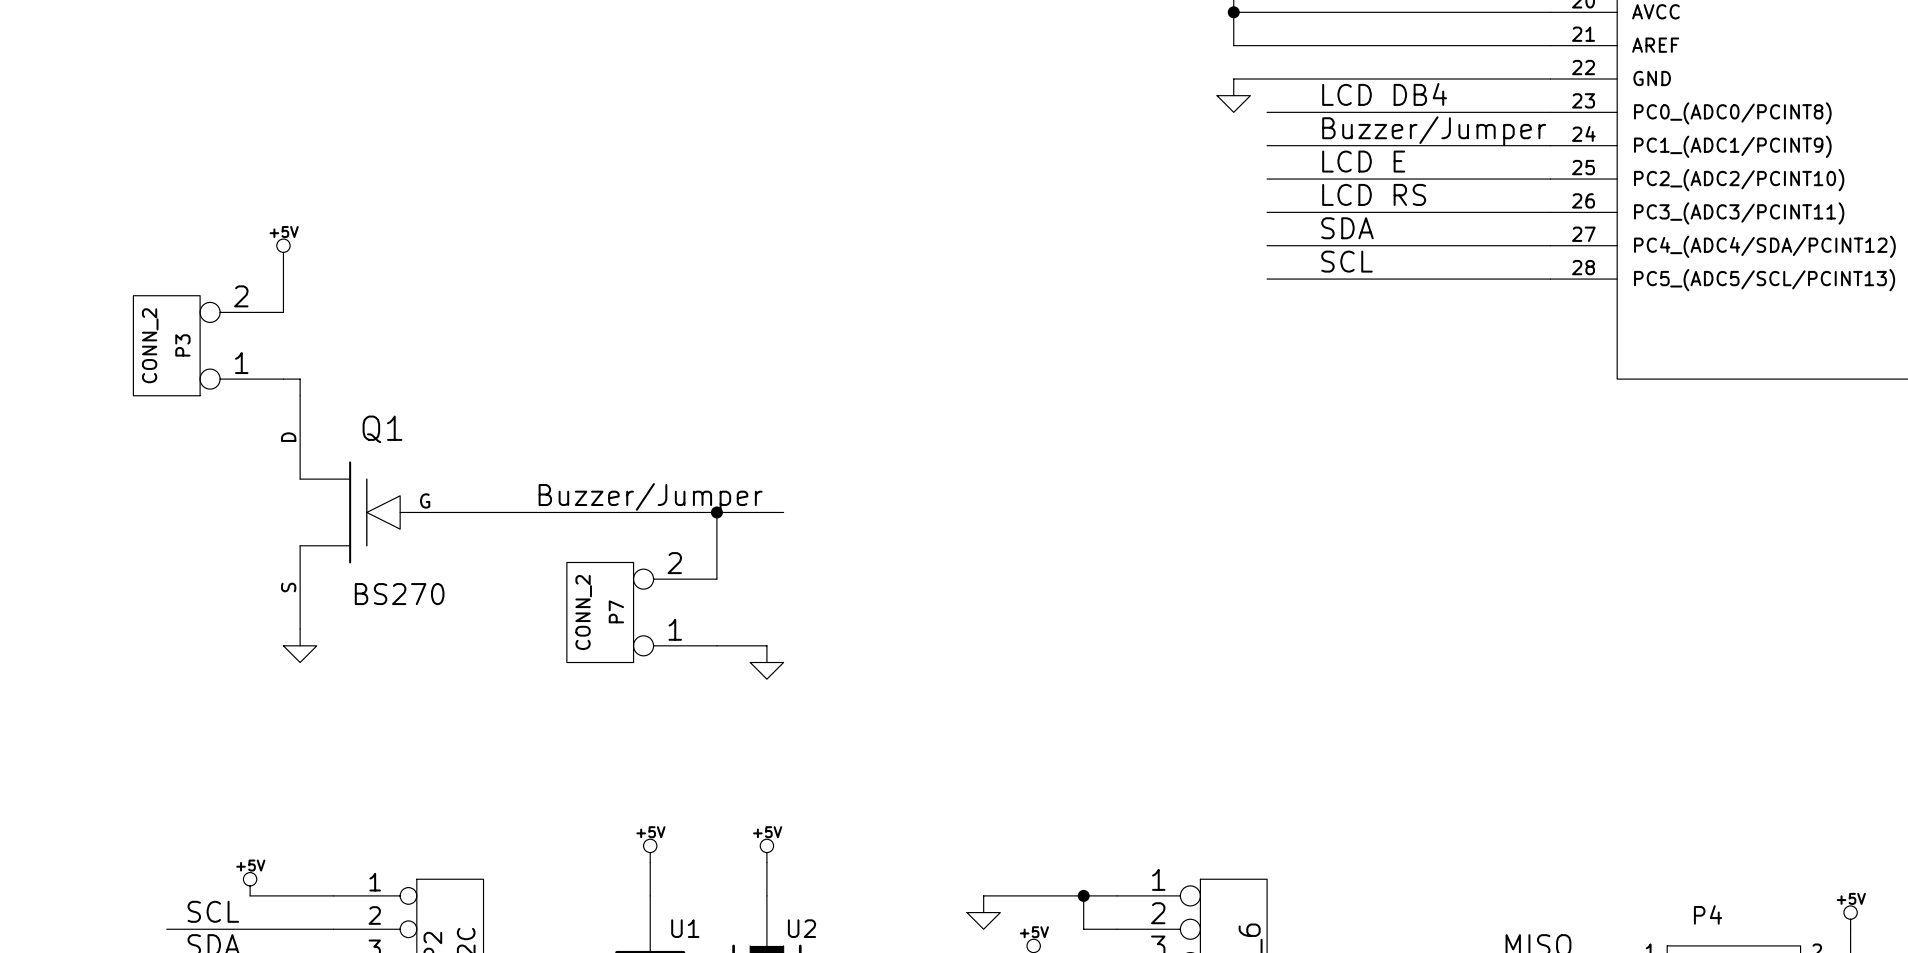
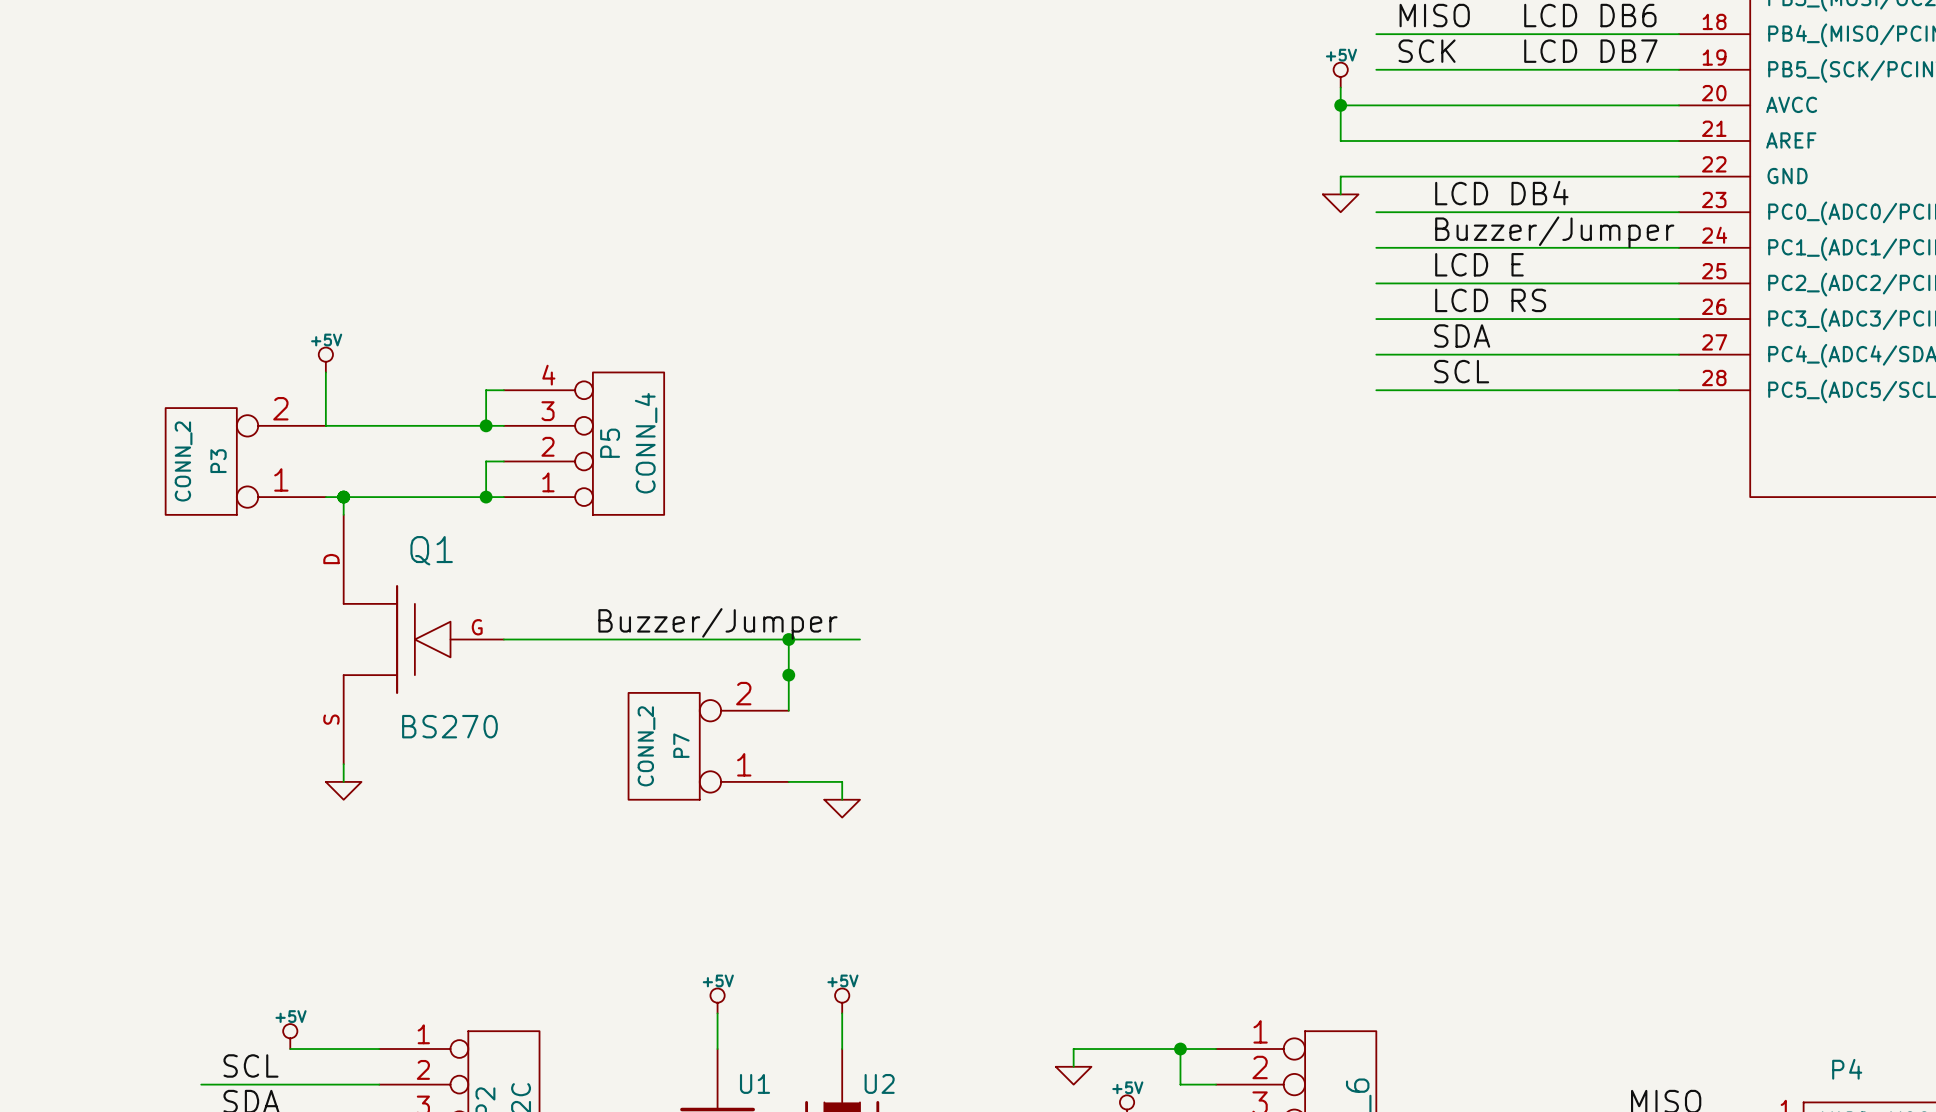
wire: none -> (503, 390) (486, 390) (486, 425)
wire: none -> (325, 425) (503, 425)
junction: none -> (486, 425)
P5: none -> CONN_4 (584, 443)
wire: none -> (503, 461) (486, 461) (486, 497)
wire: none -> (343, 497) (503, 497)
junction: none -> (343, 497)
junction: none -> (486, 497)
junction: none -> (788, 675)

